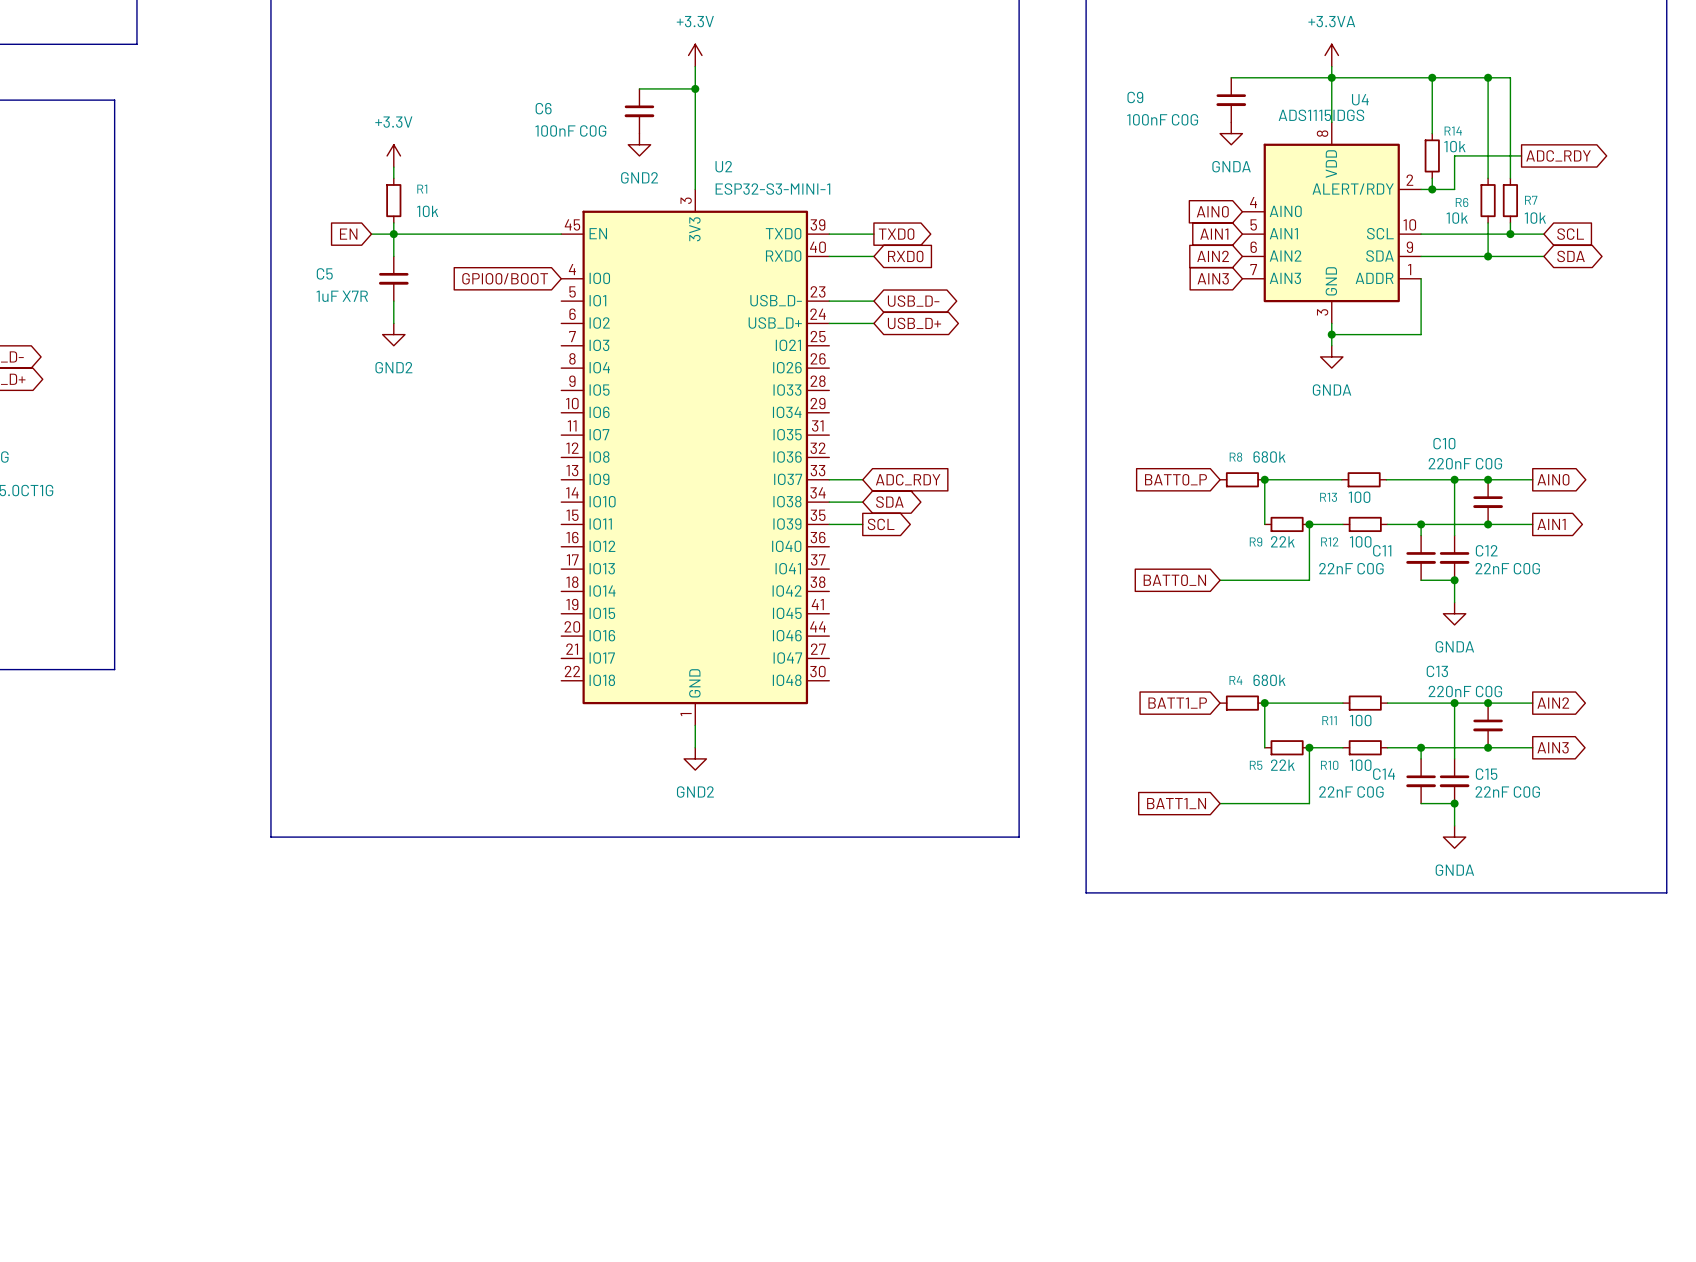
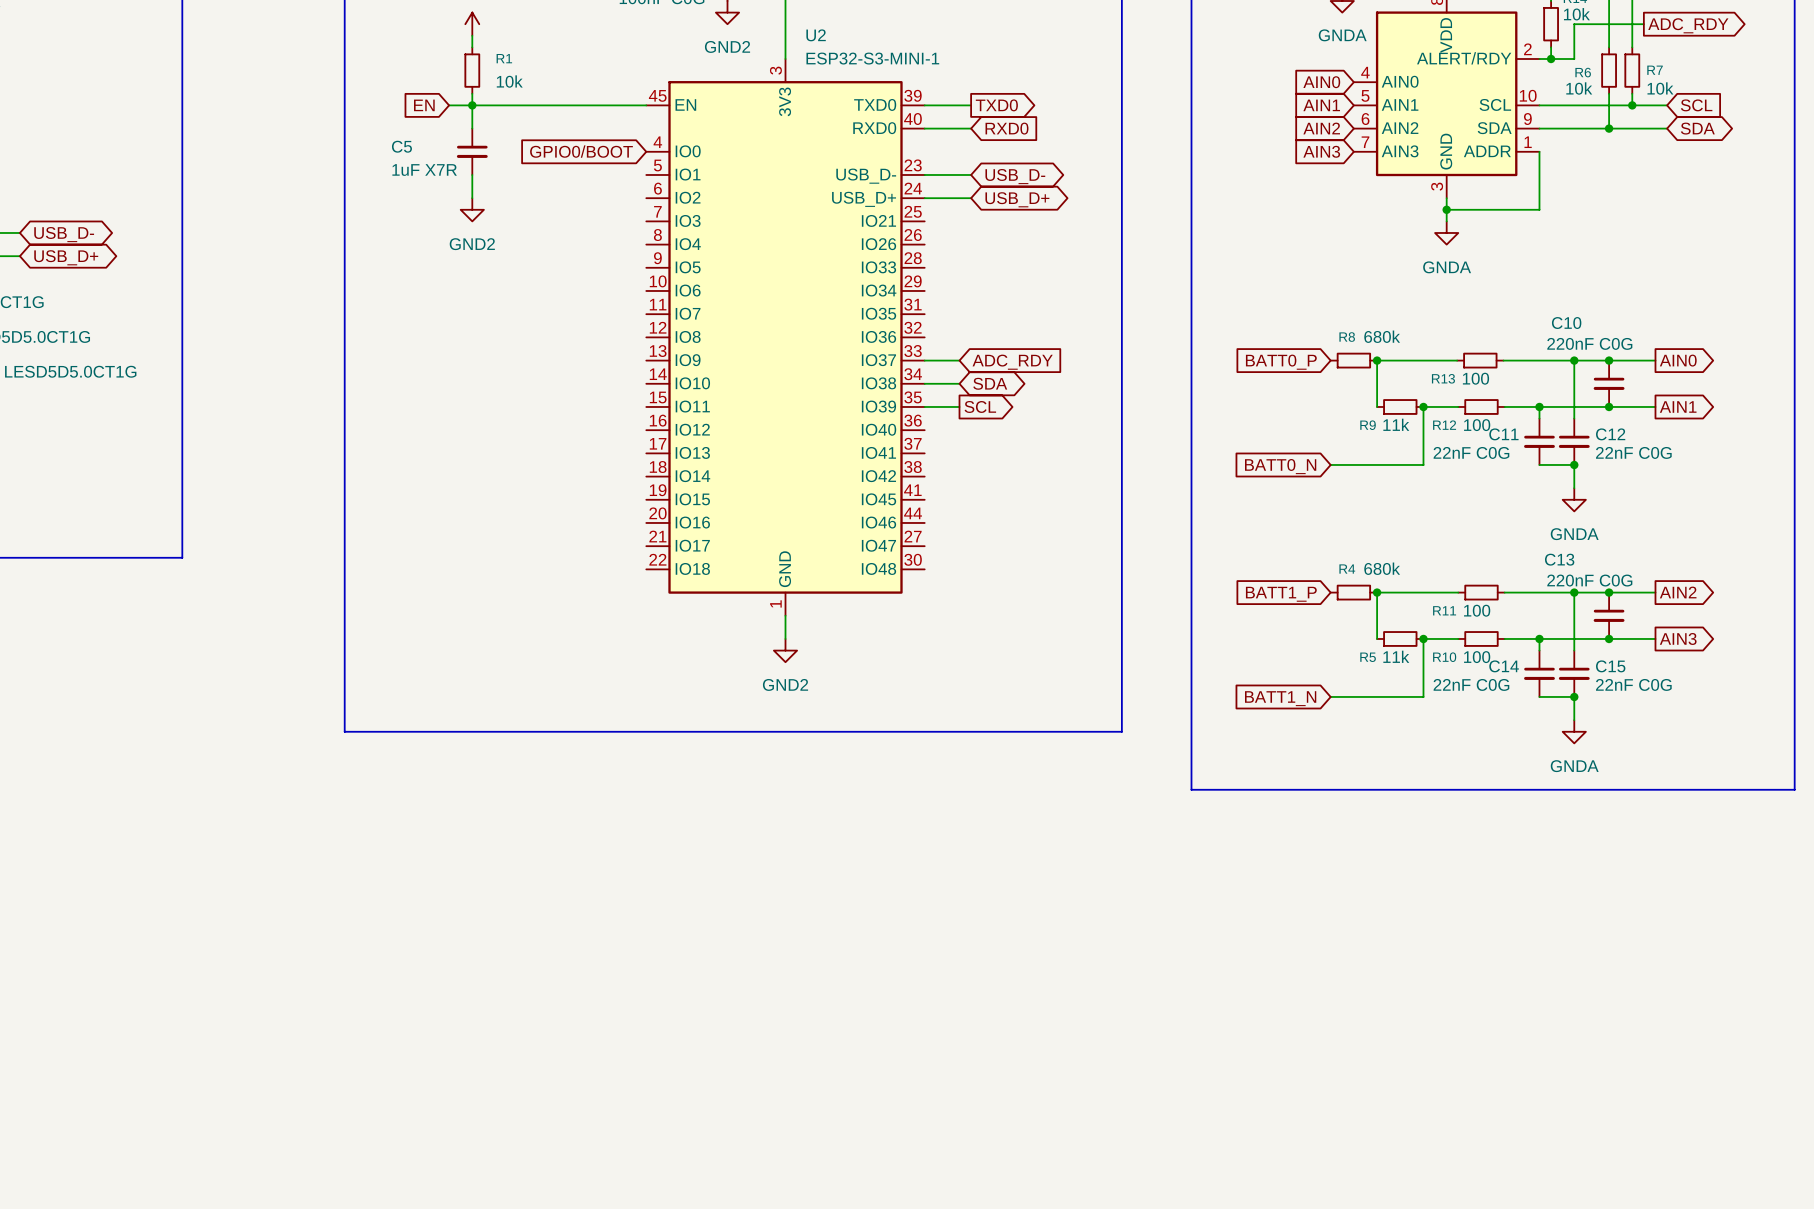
R9 value: 22k (1282, 541) -> 11k (1396, 424)
R5 value: 22k (1282, 765) -> 11k (1396, 656)

